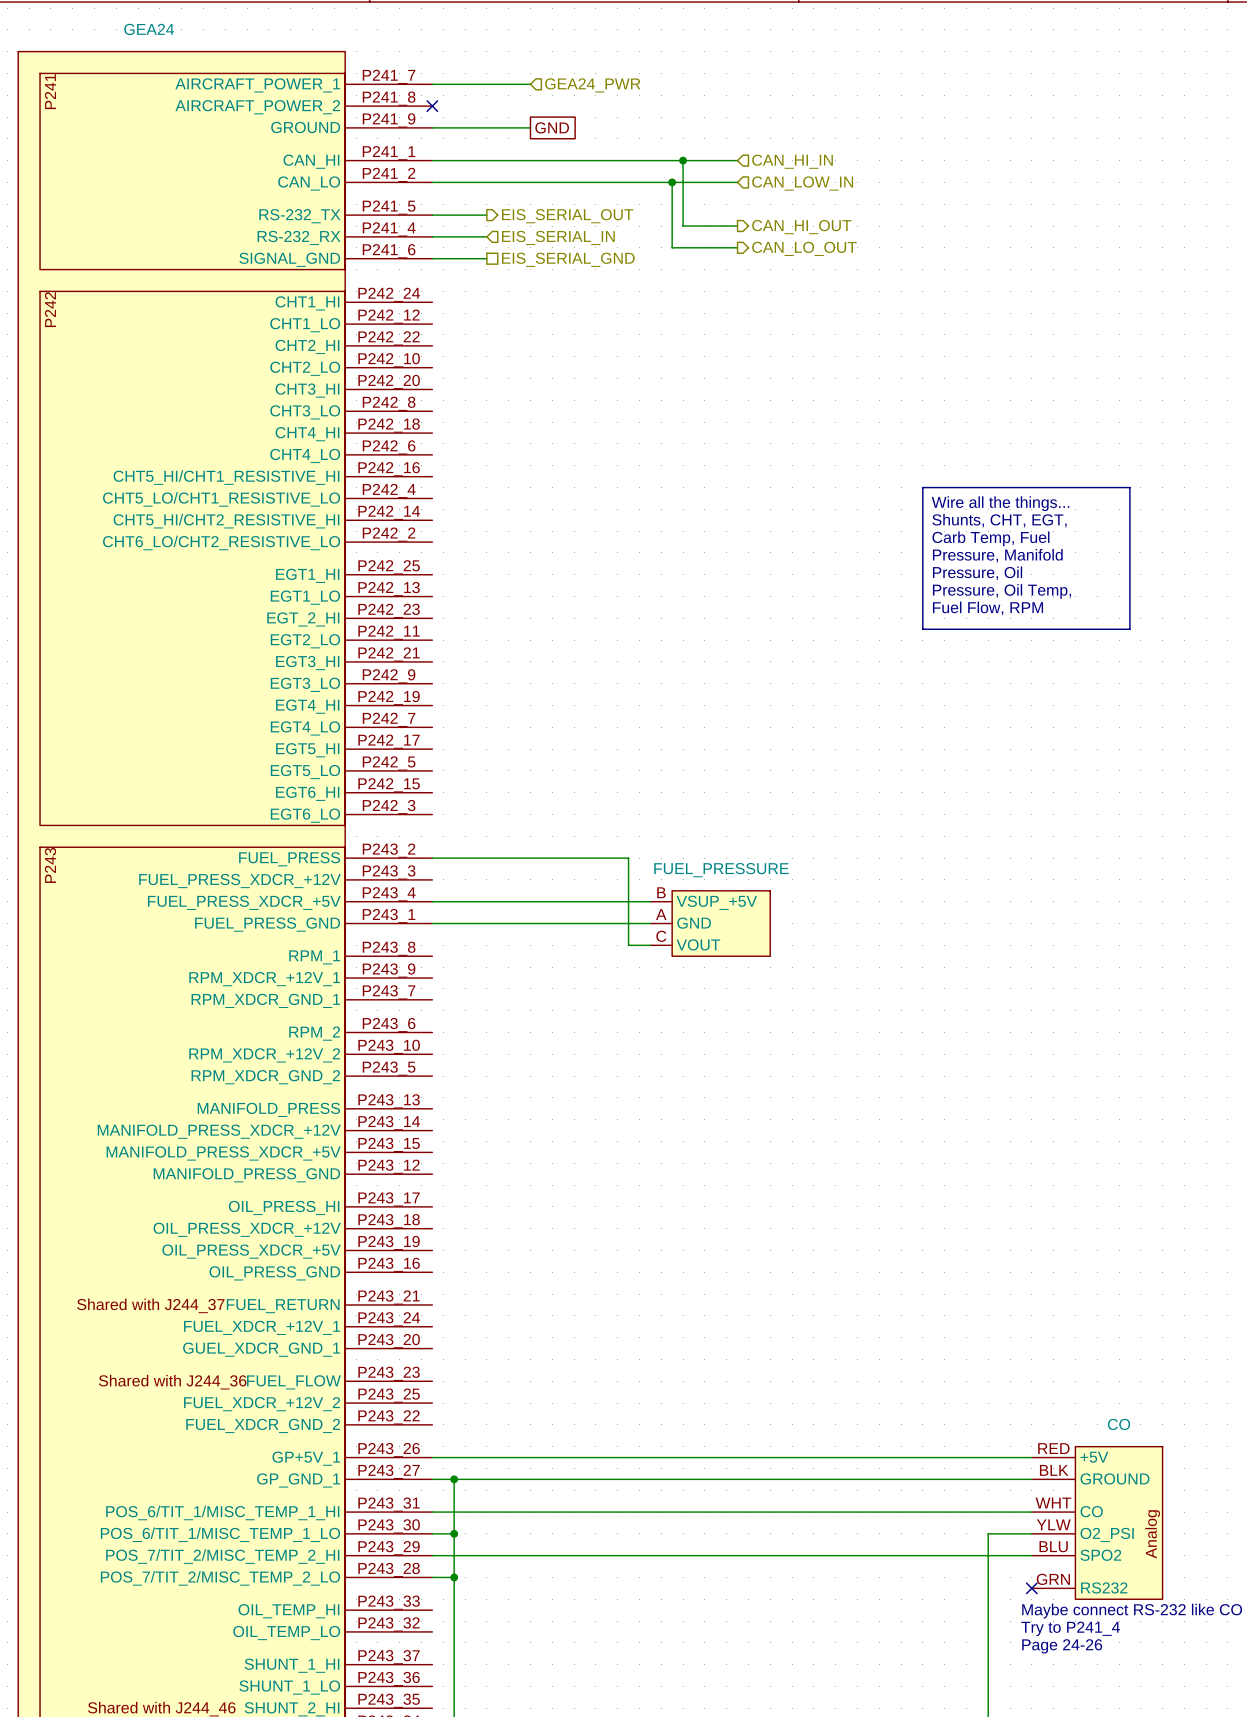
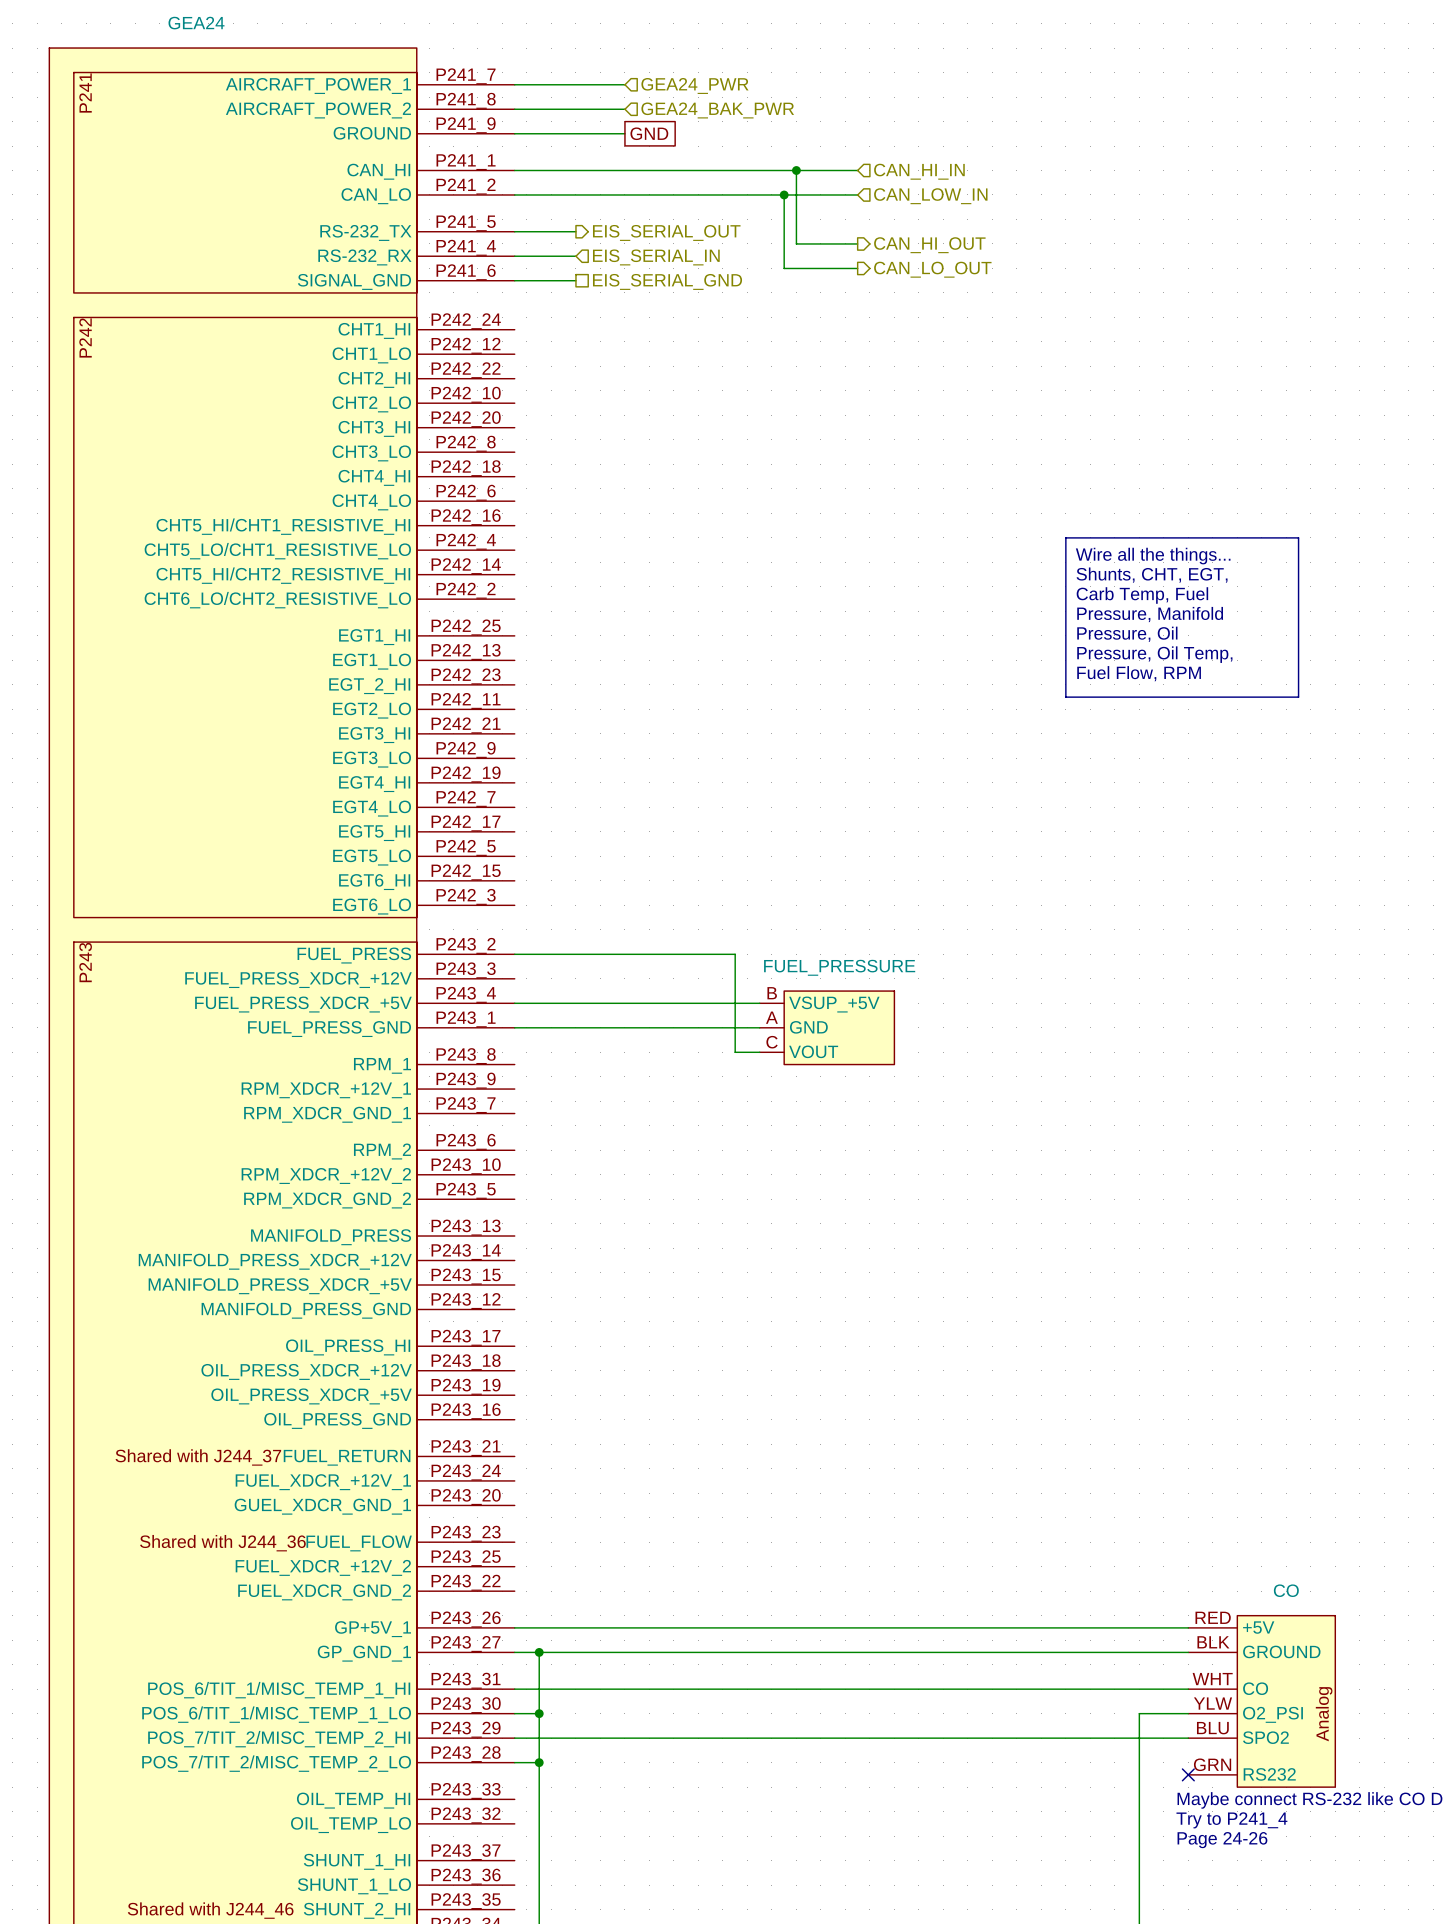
wire: none -> (514, 109) (624, 109)
no-connect mark: (432, 106) -> none
hierarchical label: none -> GEA24_BAK_PWR (717, 110)

